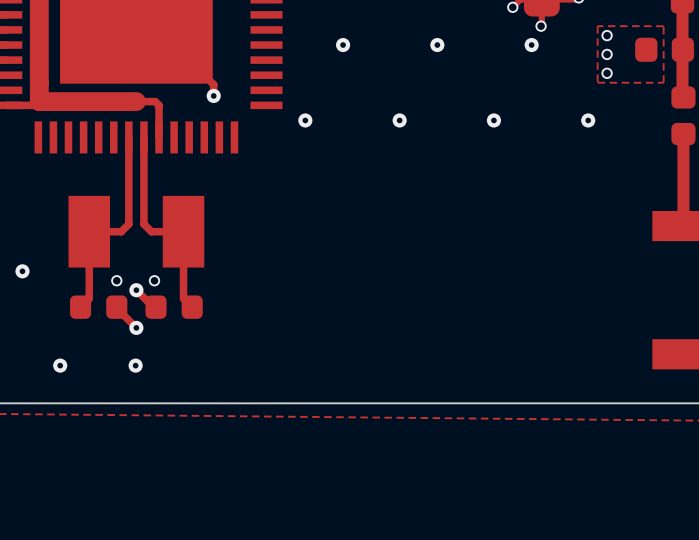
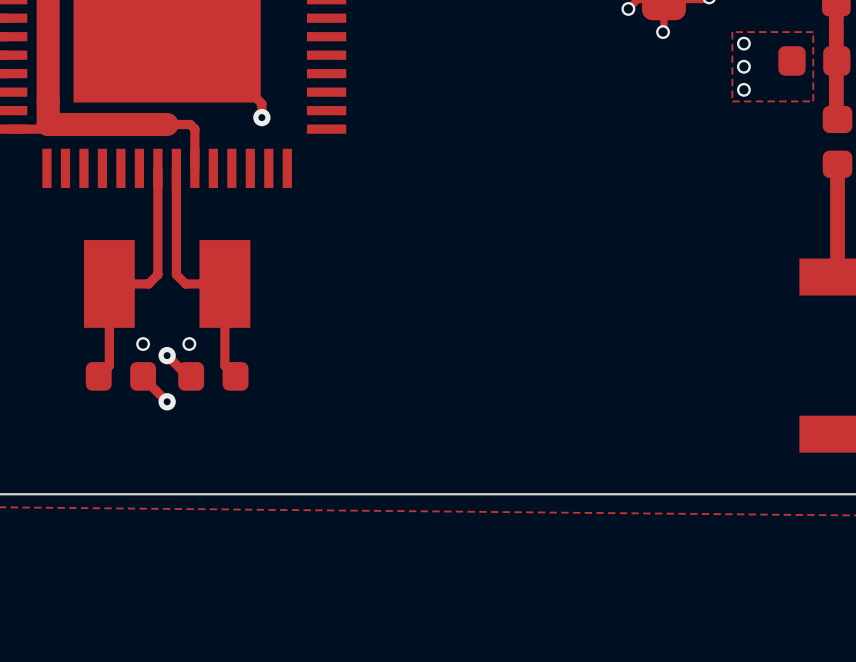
via: (343, 45) -> none
via: (437, 45) -> none
via: (531, 45) -> none
via: (305, 120) -> none
via: (399, 120) -> none
via: (493, 120) -> none
via: (588, 120) -> none
via: (22, 271) -> none
via: (60, 365) -> none
via: (135, 365) -> none

